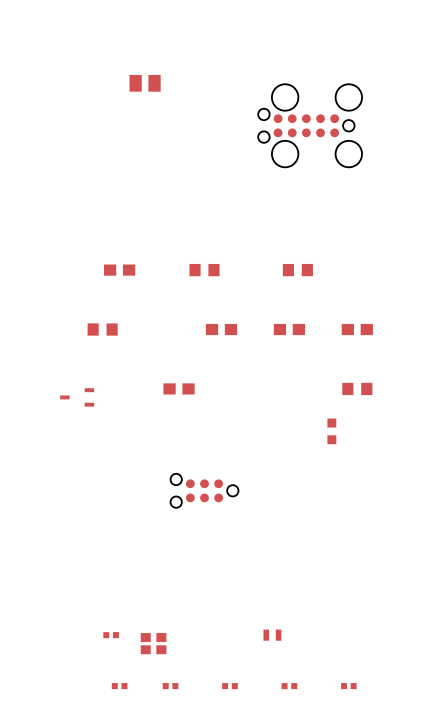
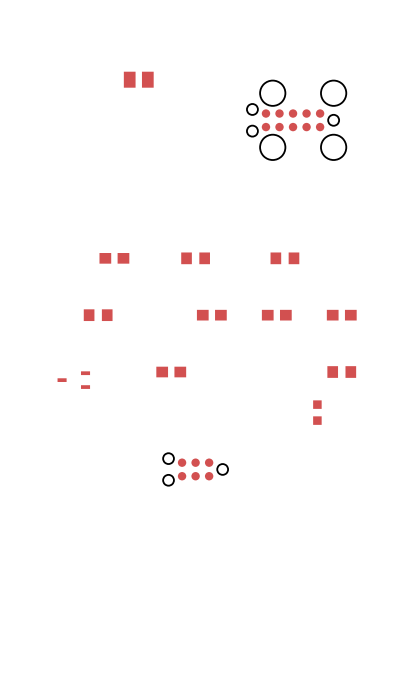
part: (111, 635) -> none
part: (272, 635) -> none
part: (153, 643) -> none
part: (119, 686) -> none
part: (170, 686) -> none
part: (229, 686) -> none
part: (289, 686) -> none
part: (348, 686) -> none

